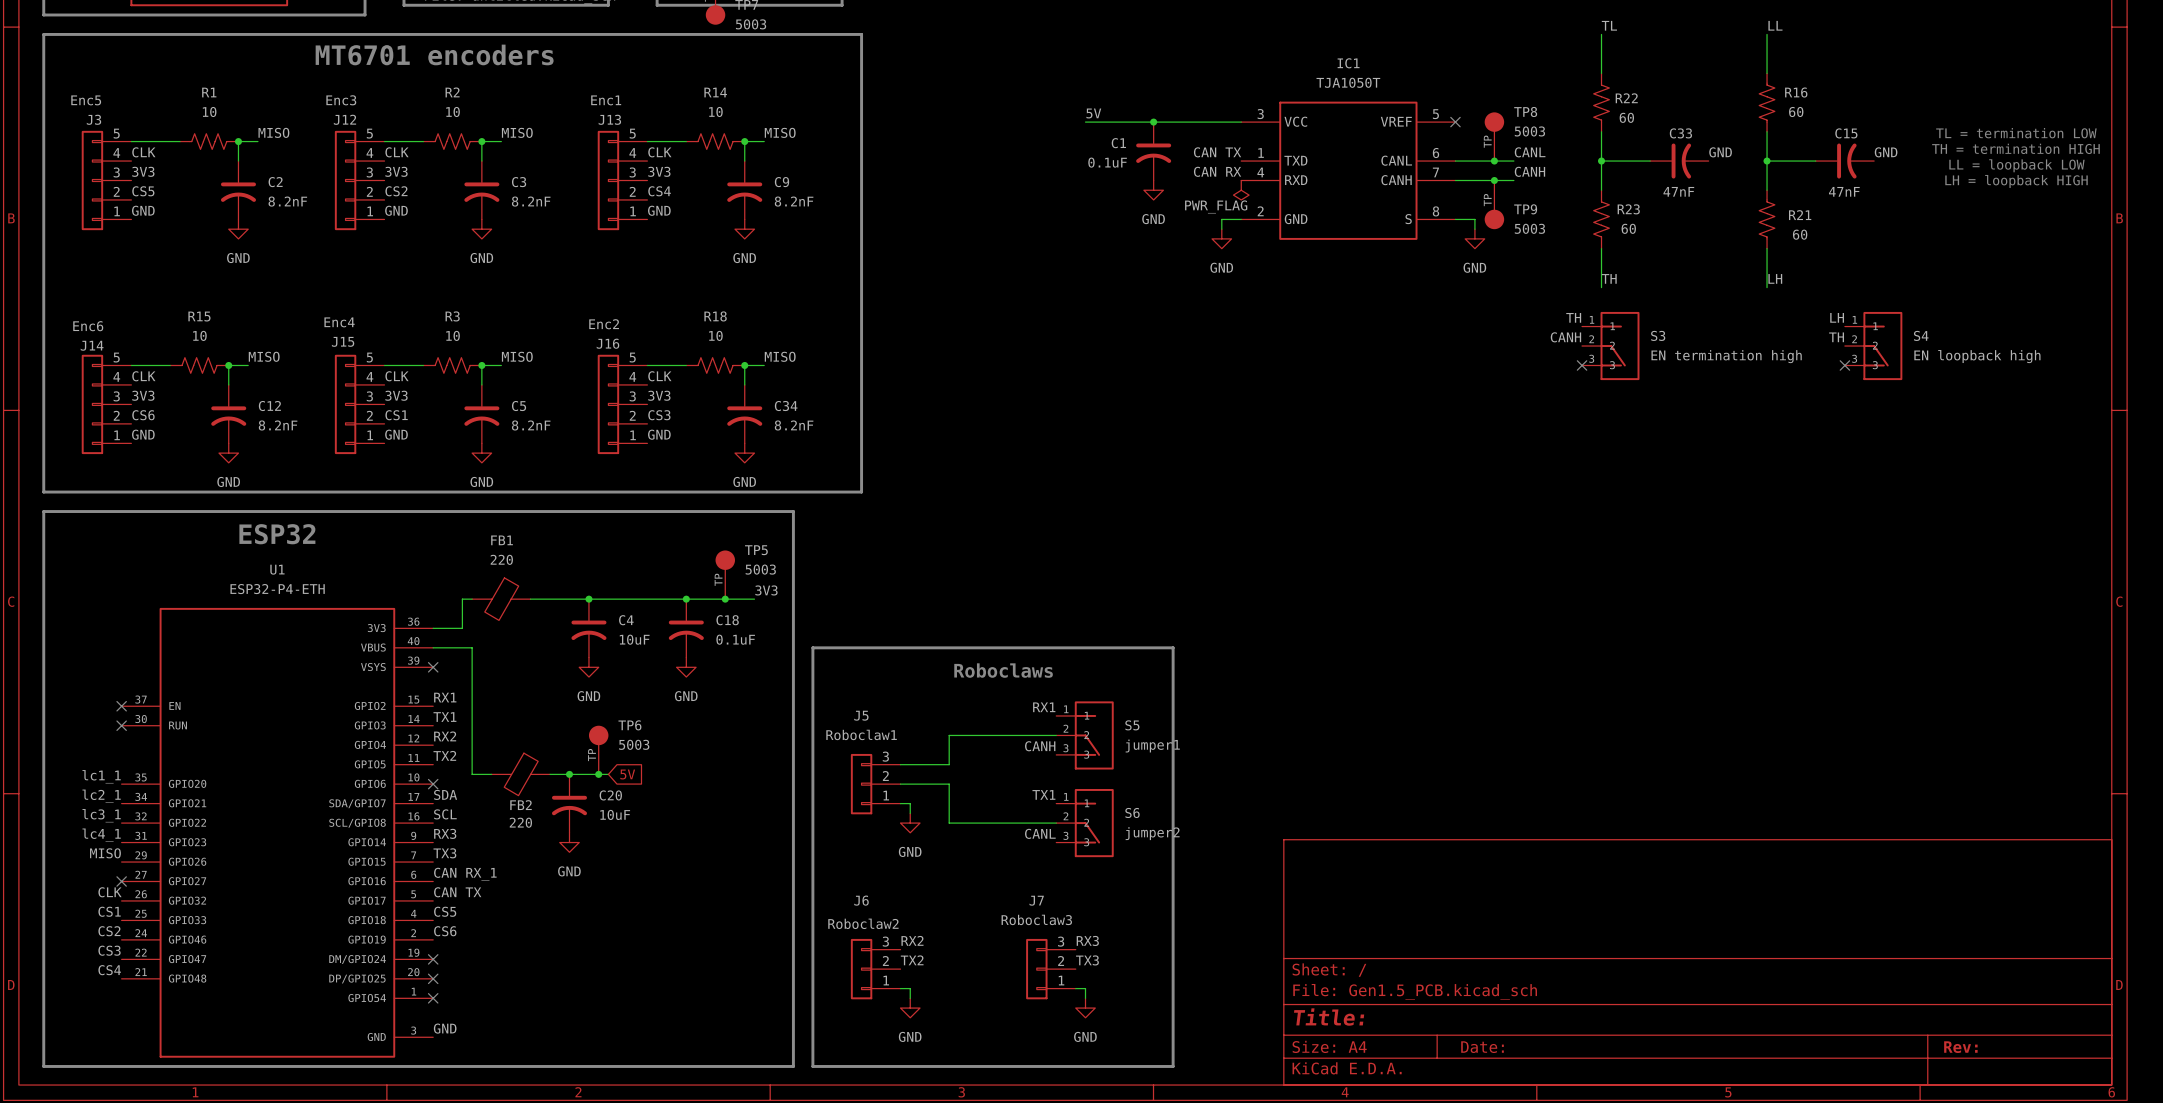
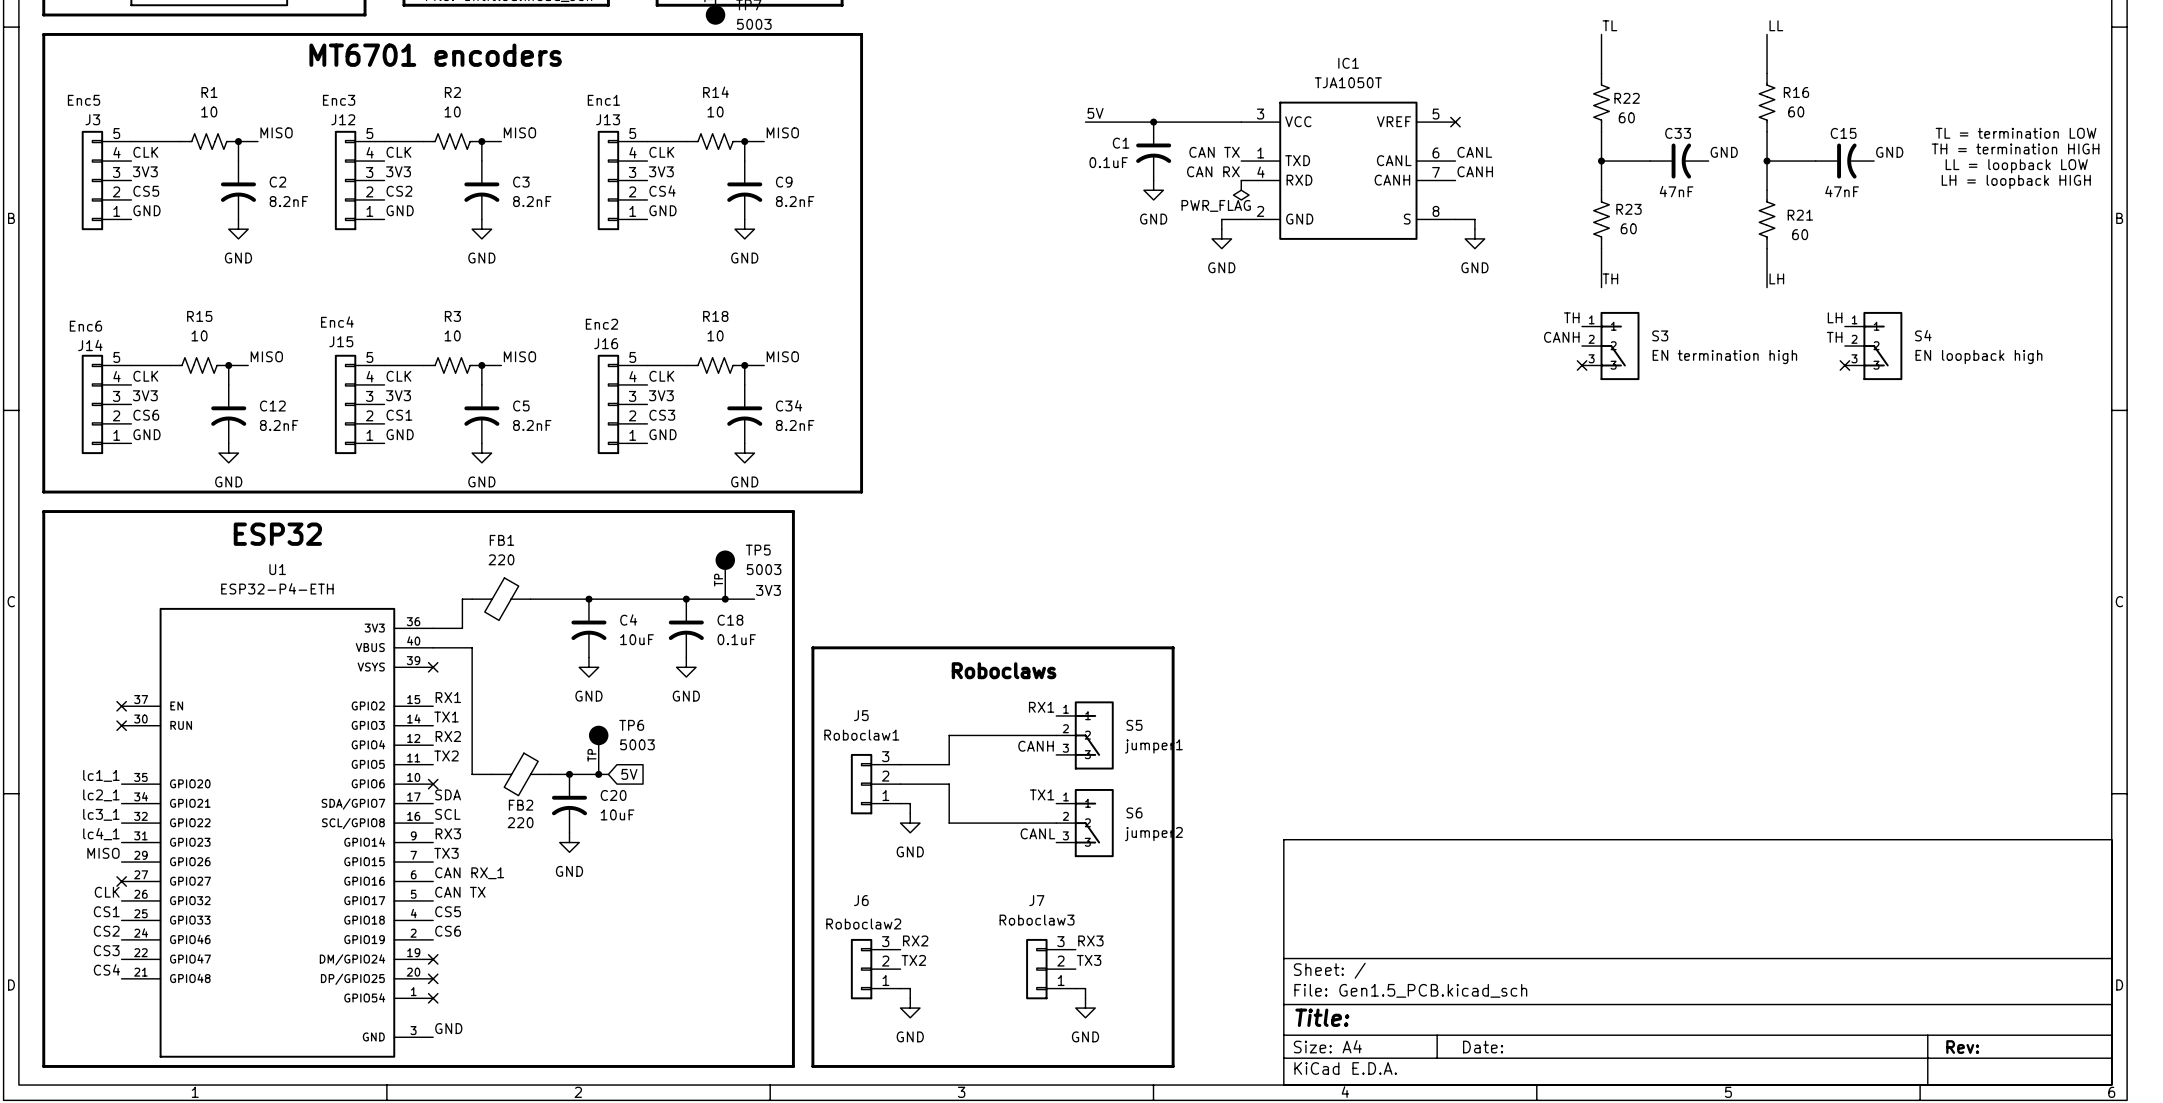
TP8: 5003 (1494, 136) -> none
label position: CANL (1530, 152) -> CANL (1474, 152)
wire: (1455, 161) (1513, 161) -> none
junction: (1494, 161) -> none
label position: CANH (1529, 171) -> CANH (1475, 171)
wire: (1455, 180) (1513, 180) -> none
junction: (1494, 180) -> none
TP9: 5003 (1494, 204) -> none

